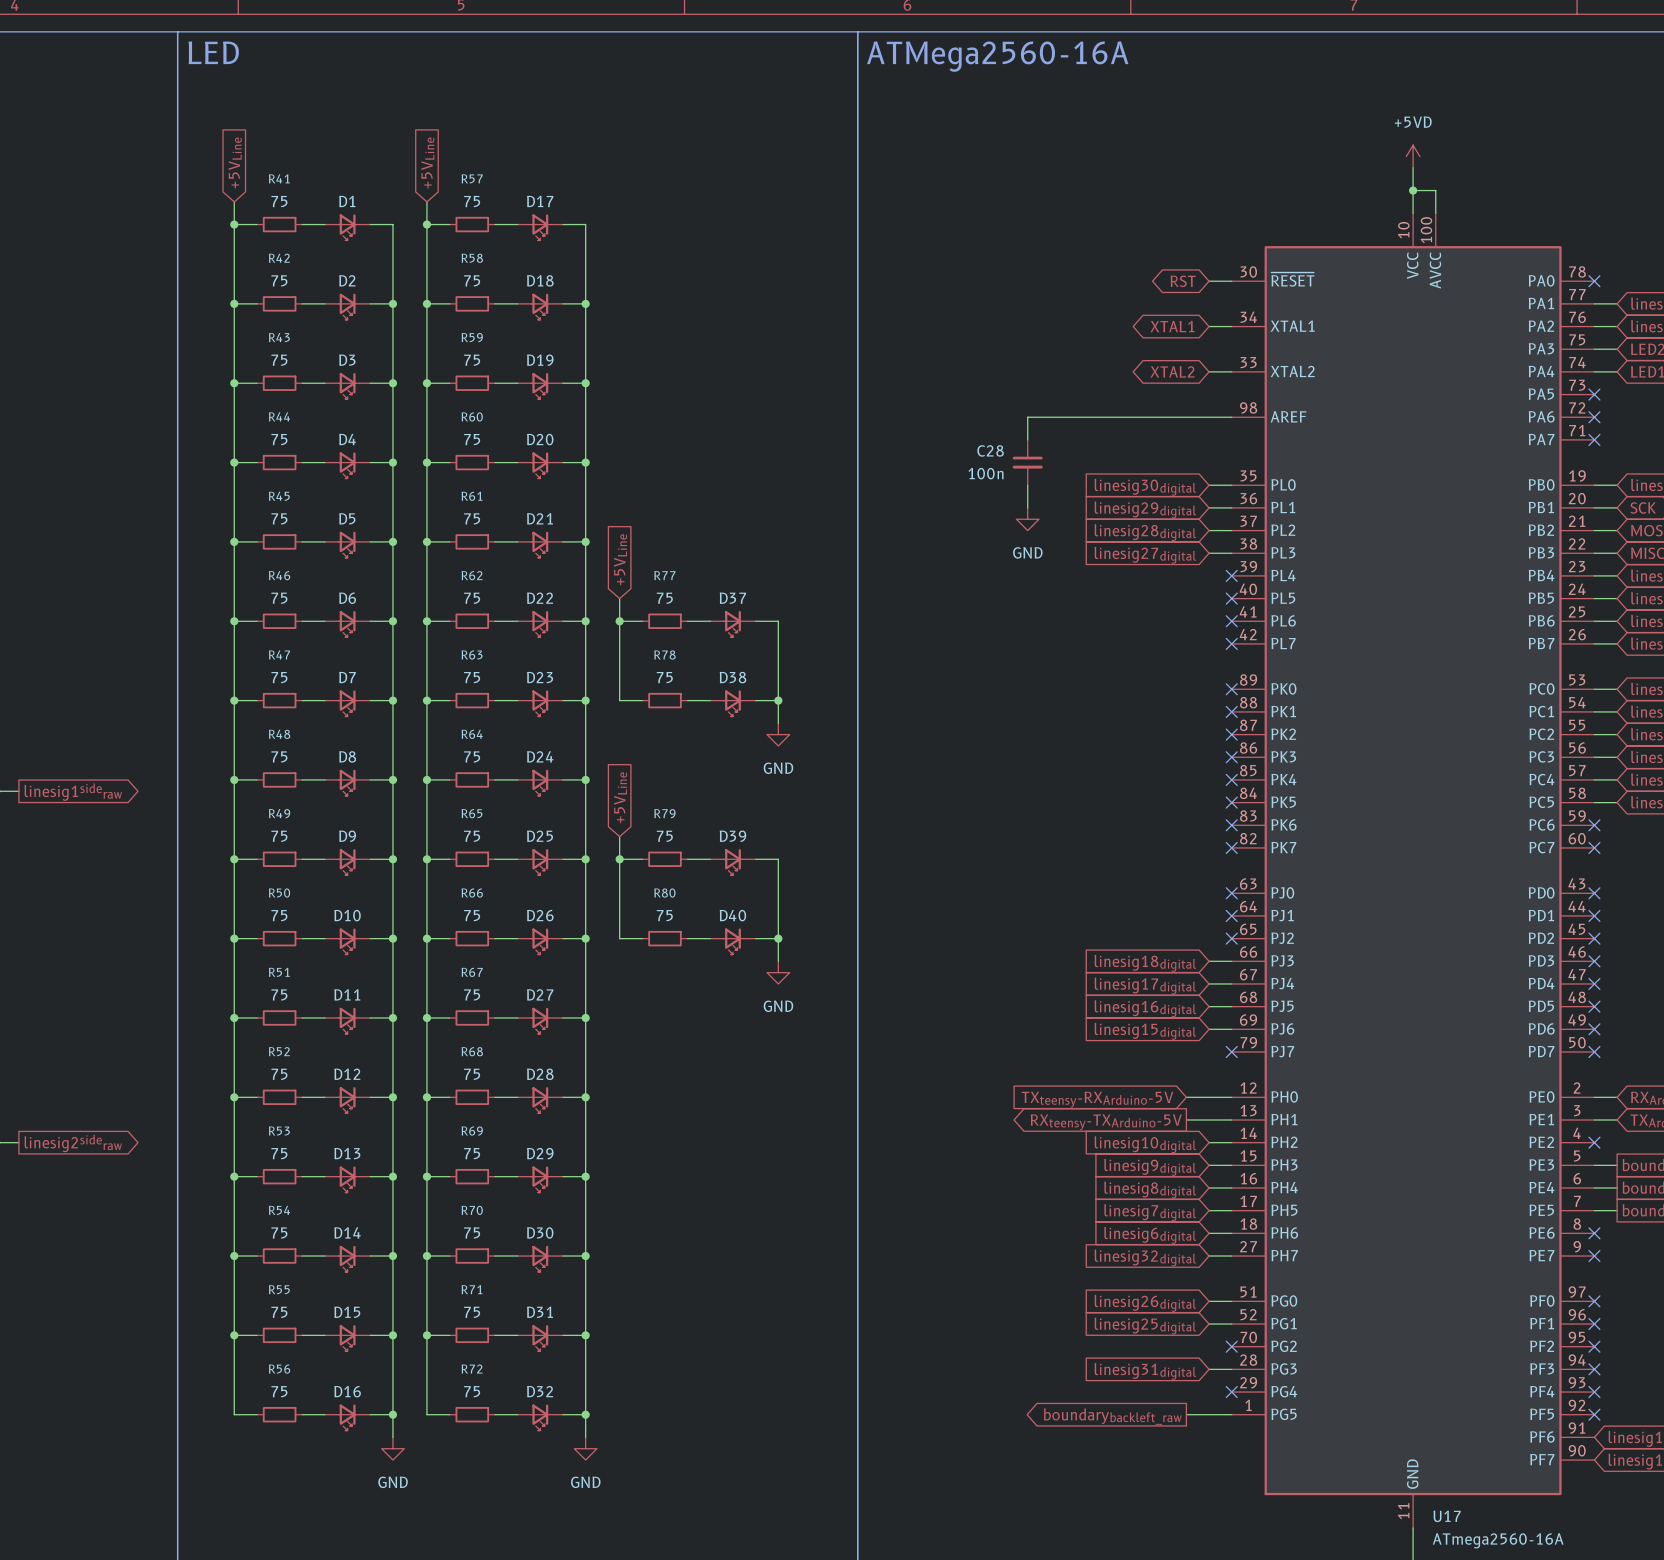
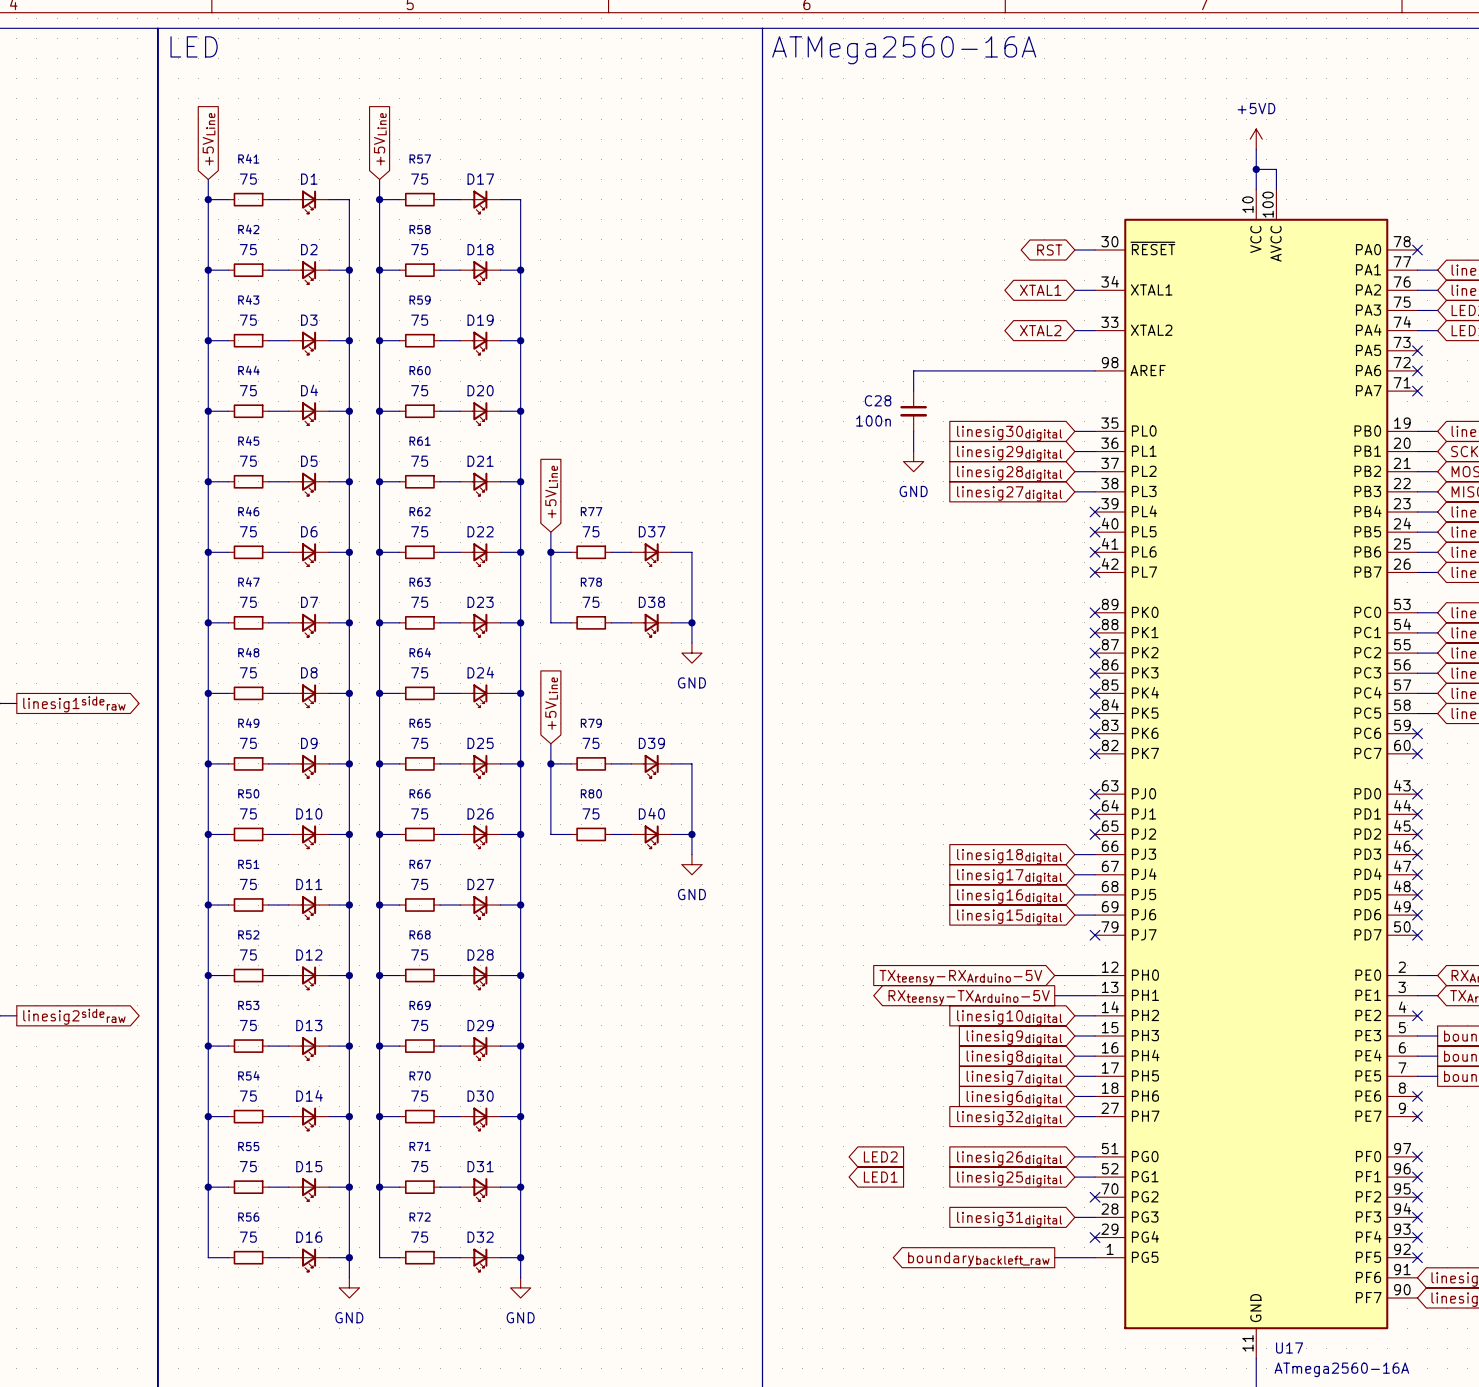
global label: none -> LED2 (880, 1156)
global label: none -> LED1 (880, 1177)

